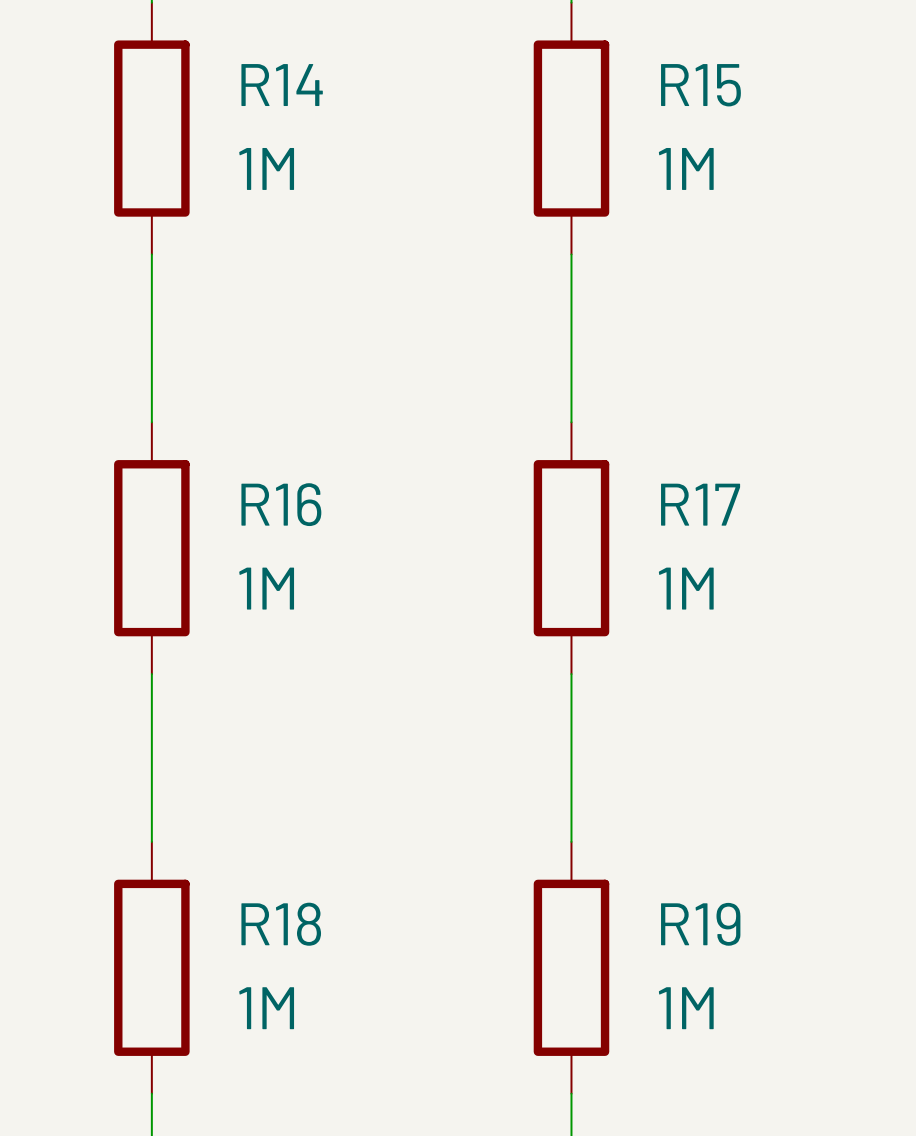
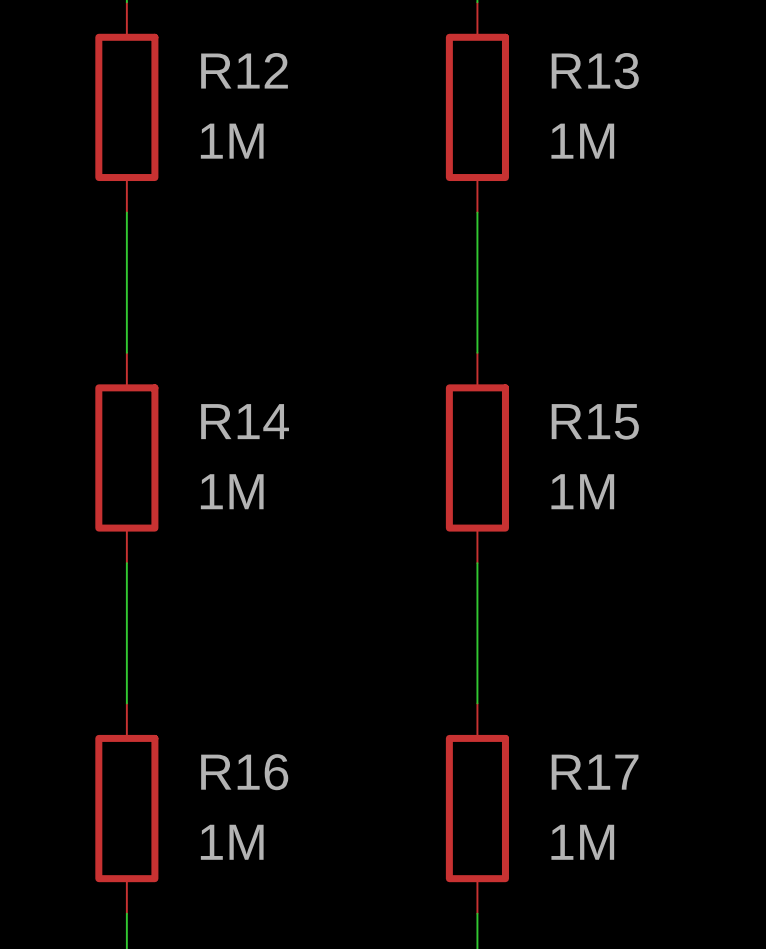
R14 name: R14 (282, 85) -> R12 (244, 70)
R15 name: R15 (700, 85) -> R13 (595, 71)
R16 name: R16 (281, 504) -> R14 (245, 421)
R17 name: R17 (700, 504) -> R15 (595, 421)
R18 name: R18 (281, 924) -> R16 (244, 772)
R19 name: R19 (700, 924) -> R17 (595, 772)

